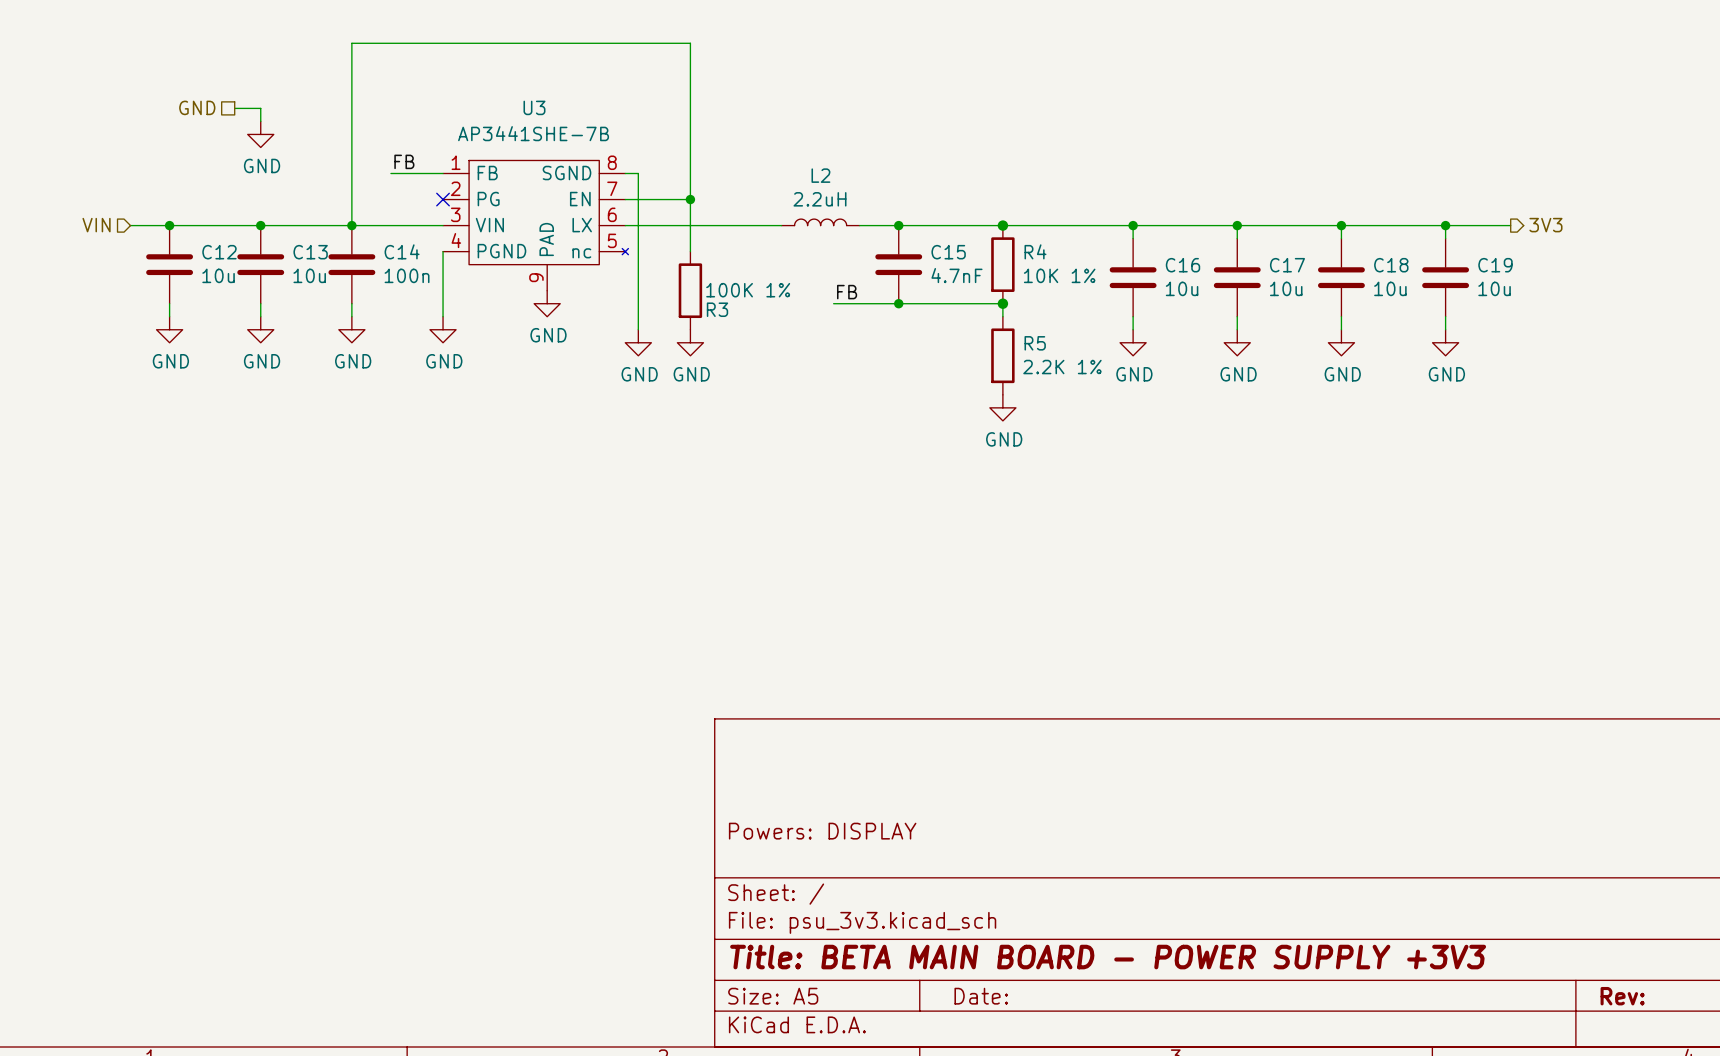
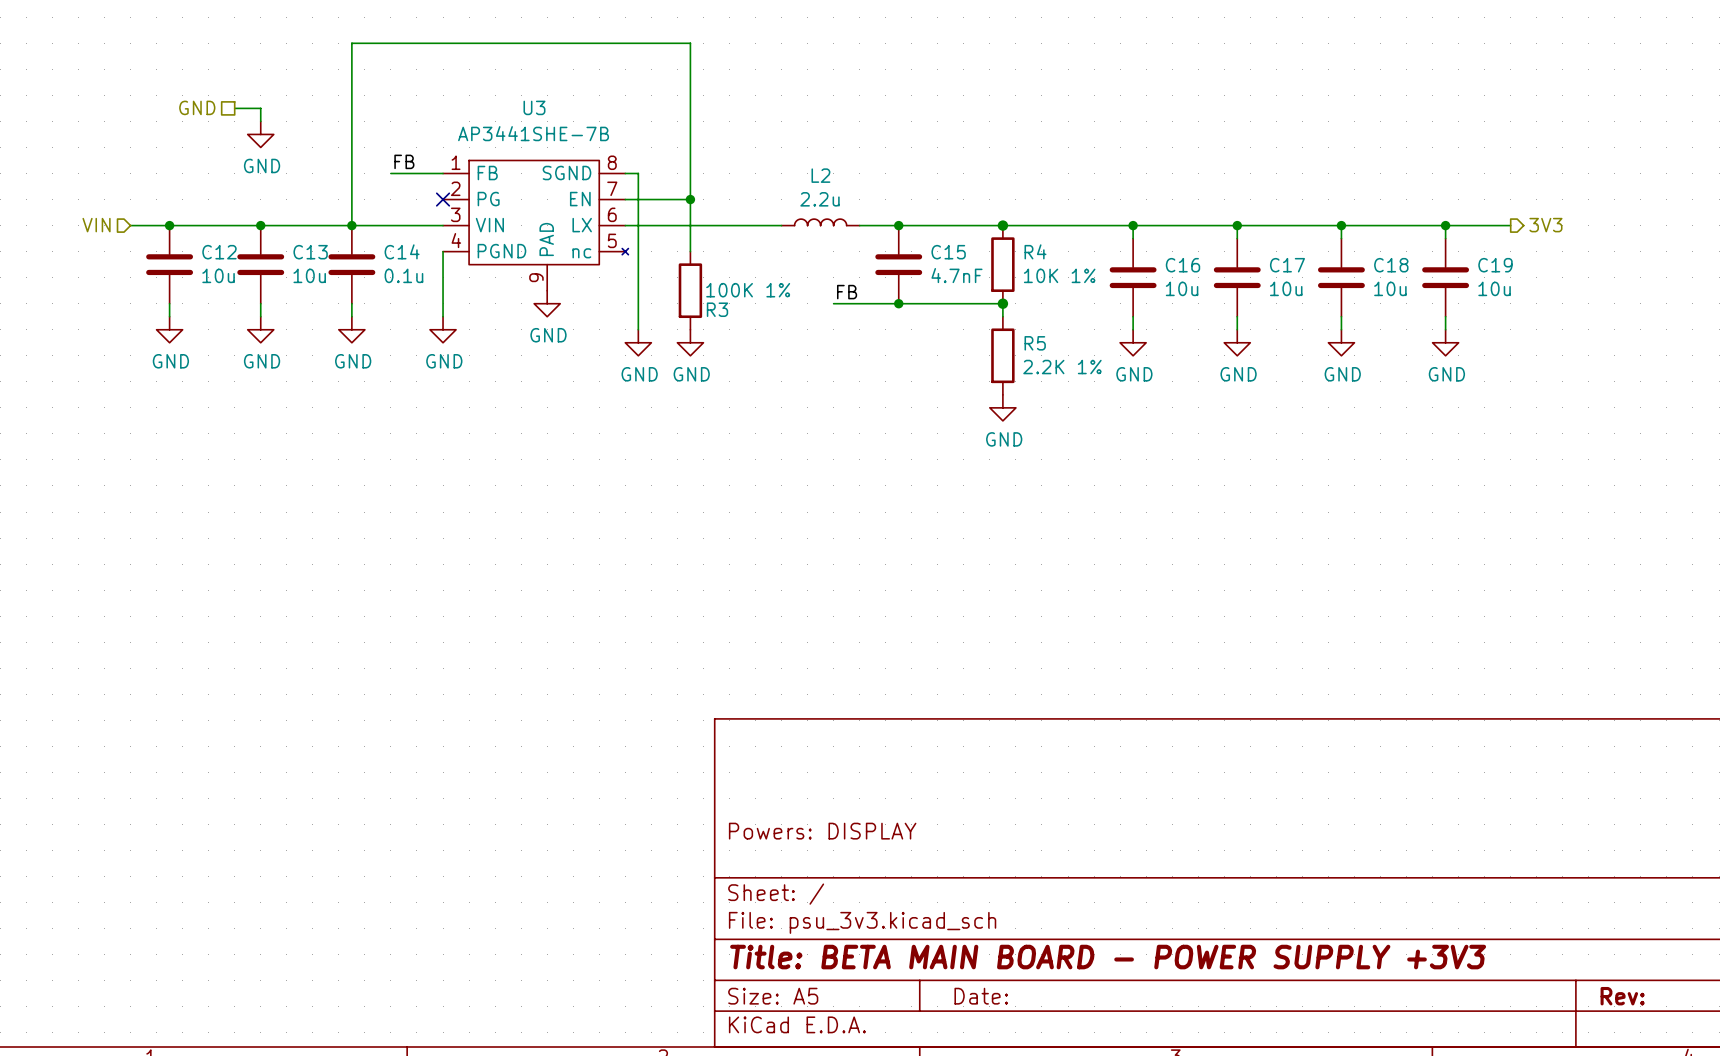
L2 value: 2.2uH (820, 199) -> 2.2u (820, 199)
C14 value: 100n (407, 275) -> 0.1u (403, 275)

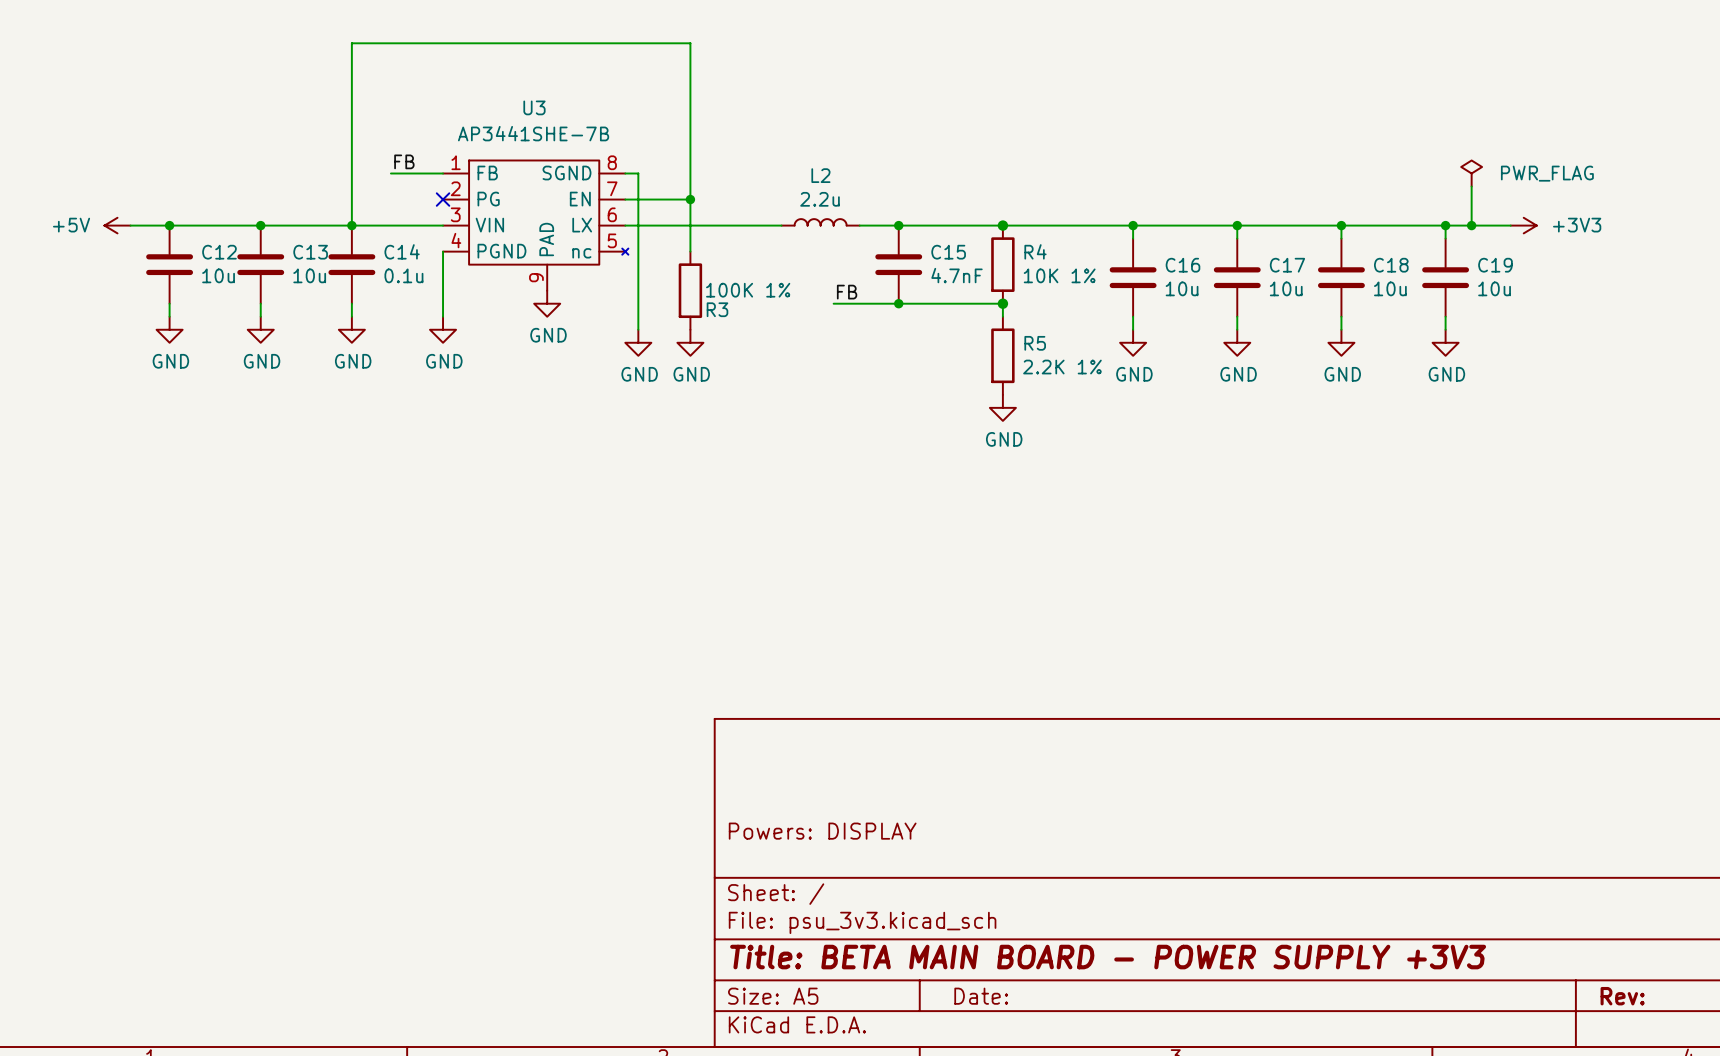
hierarchical label: GND (197, 107) -> none
wire: (234, 108) (260, 108) (260, 121) -> none
power symbol: GND (260, 134) -> none
power symbol: none -> PWR_FLAG (1471, 173)
wire: none -> (1471, 186) (1471, 225)
hierarchical label: VIN (96, 225) -> none
power symbol: none -> +5V (117, 225)
junction: none -> (1471, 225)
power symbol: none -> +3V3 (1523, 225)
hierarchical label: 3V3 (1545, 225) -> none

